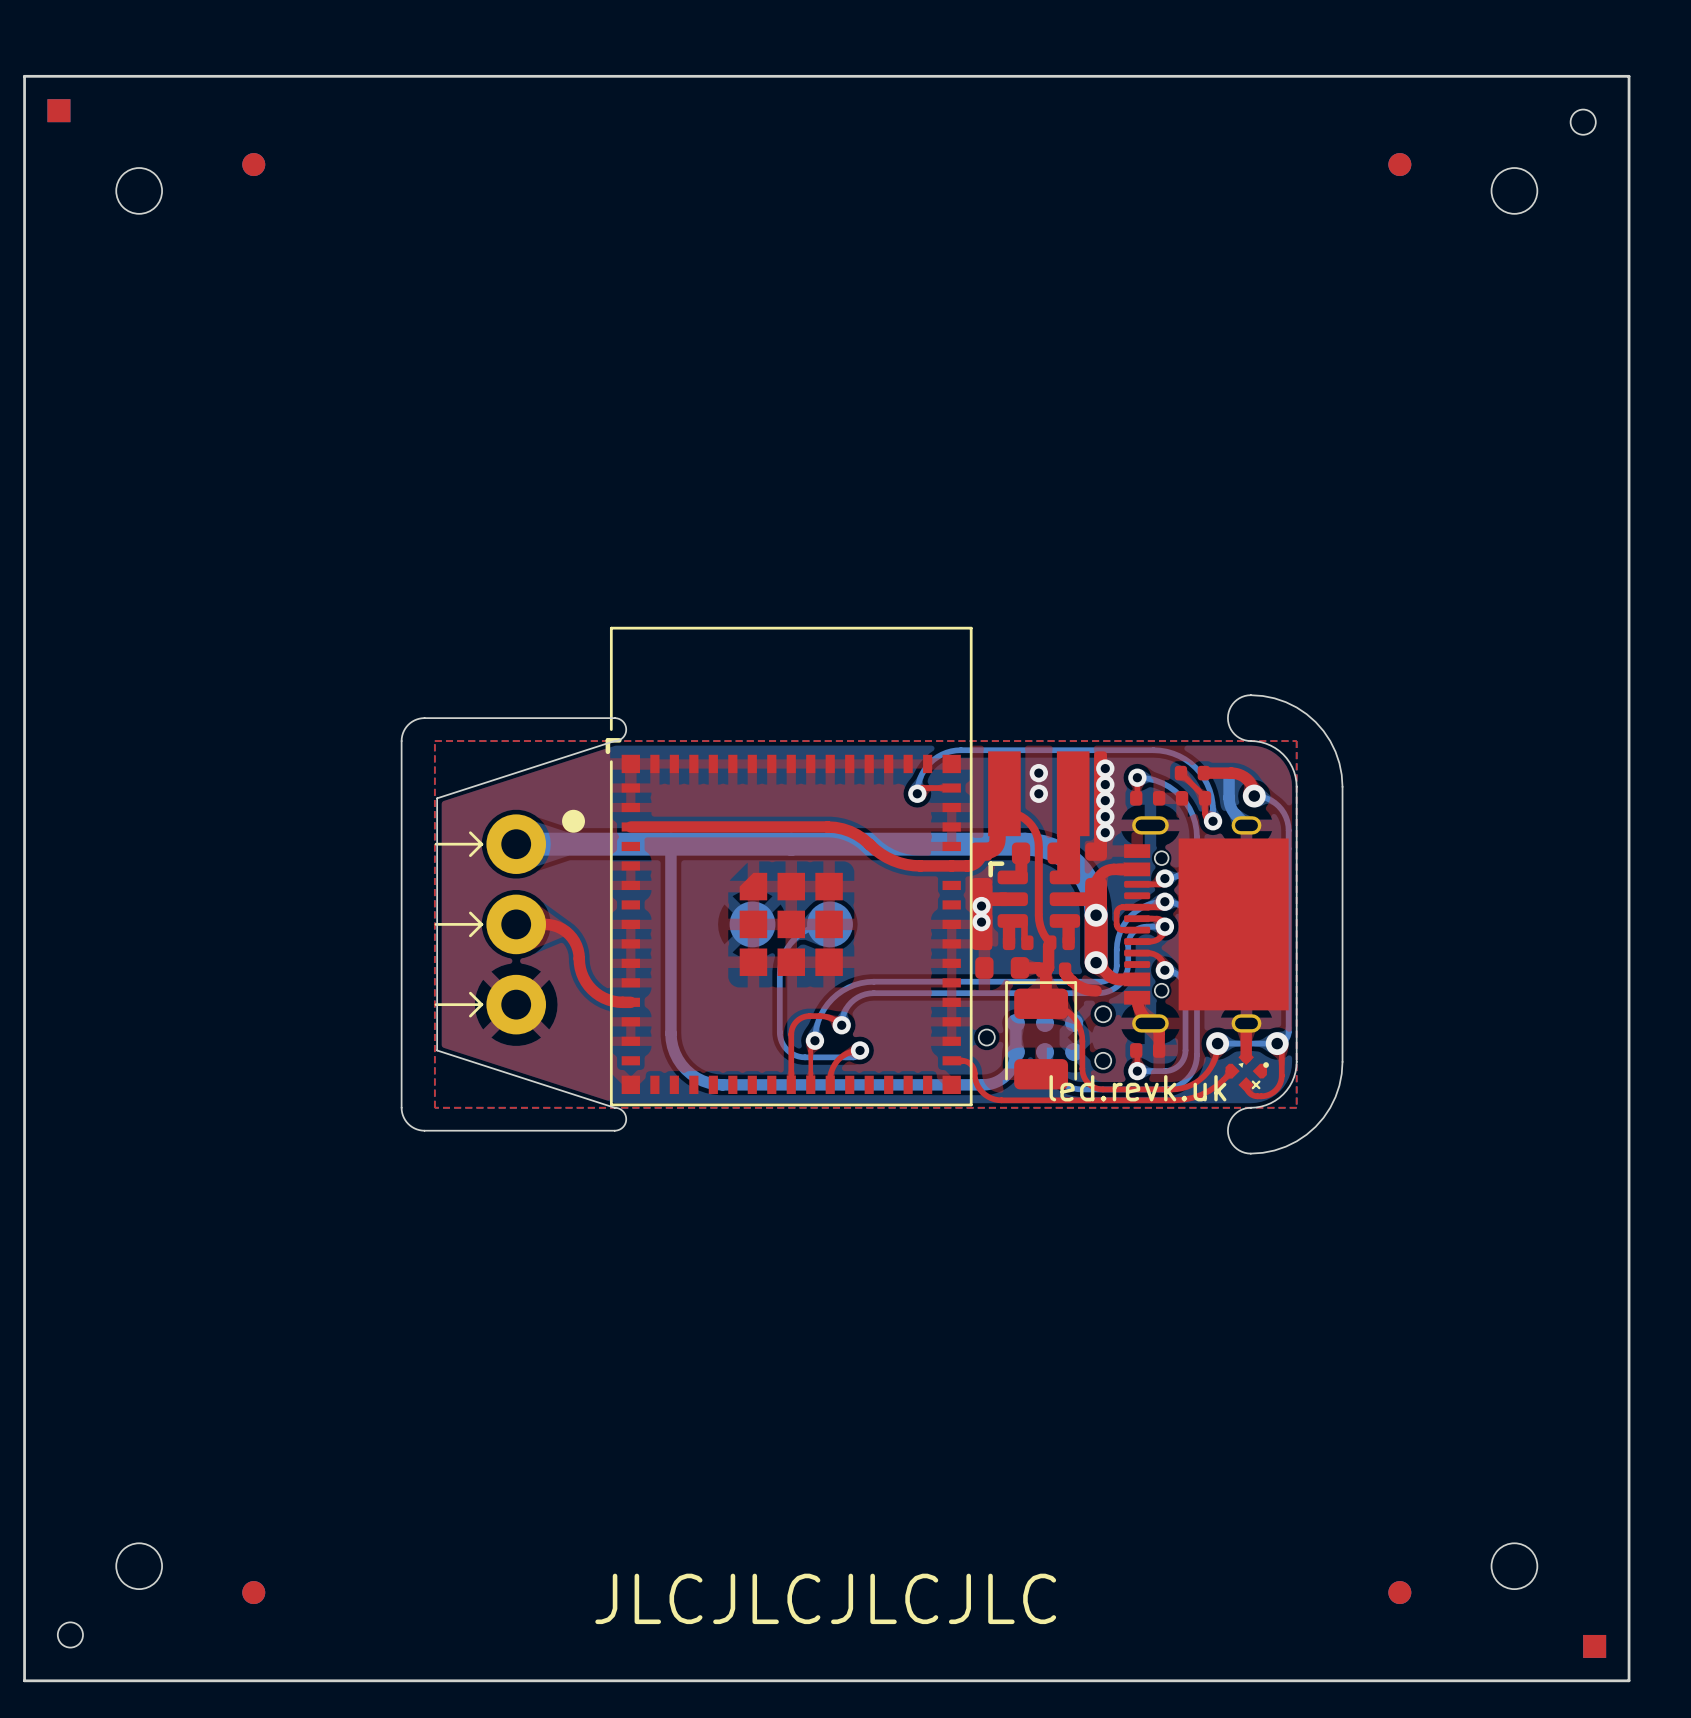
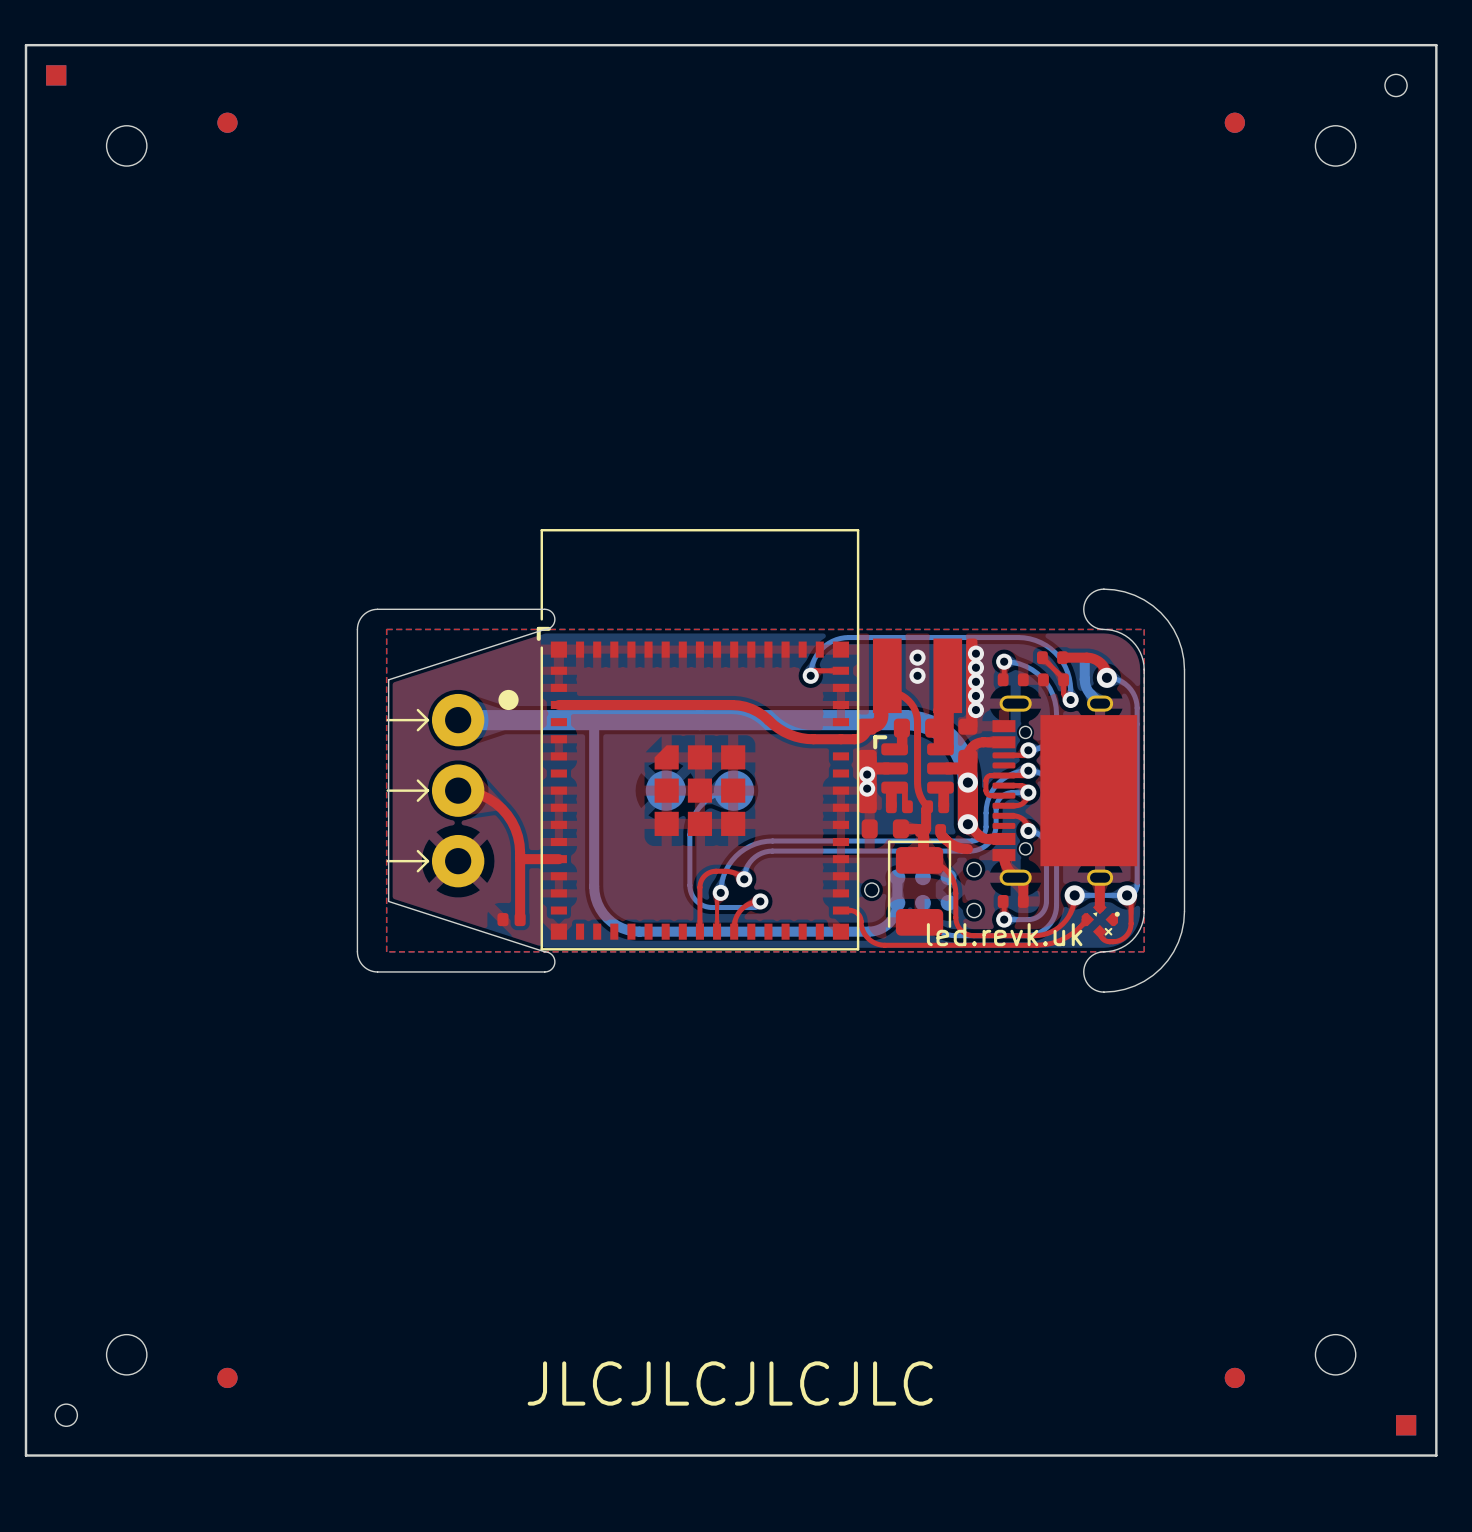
top track: (516, 924) (549, 924) (565, 931) (576, 945) (581, 973) (588, 985) (603, 998) (622, 1002) -> (458, 790) (481, 795) (495, 803) (507, 814) (515, 828) (520, 852) (520, 919)
top track: none -> (520, 859) (551, 859)
part: none -> (511, 919)

